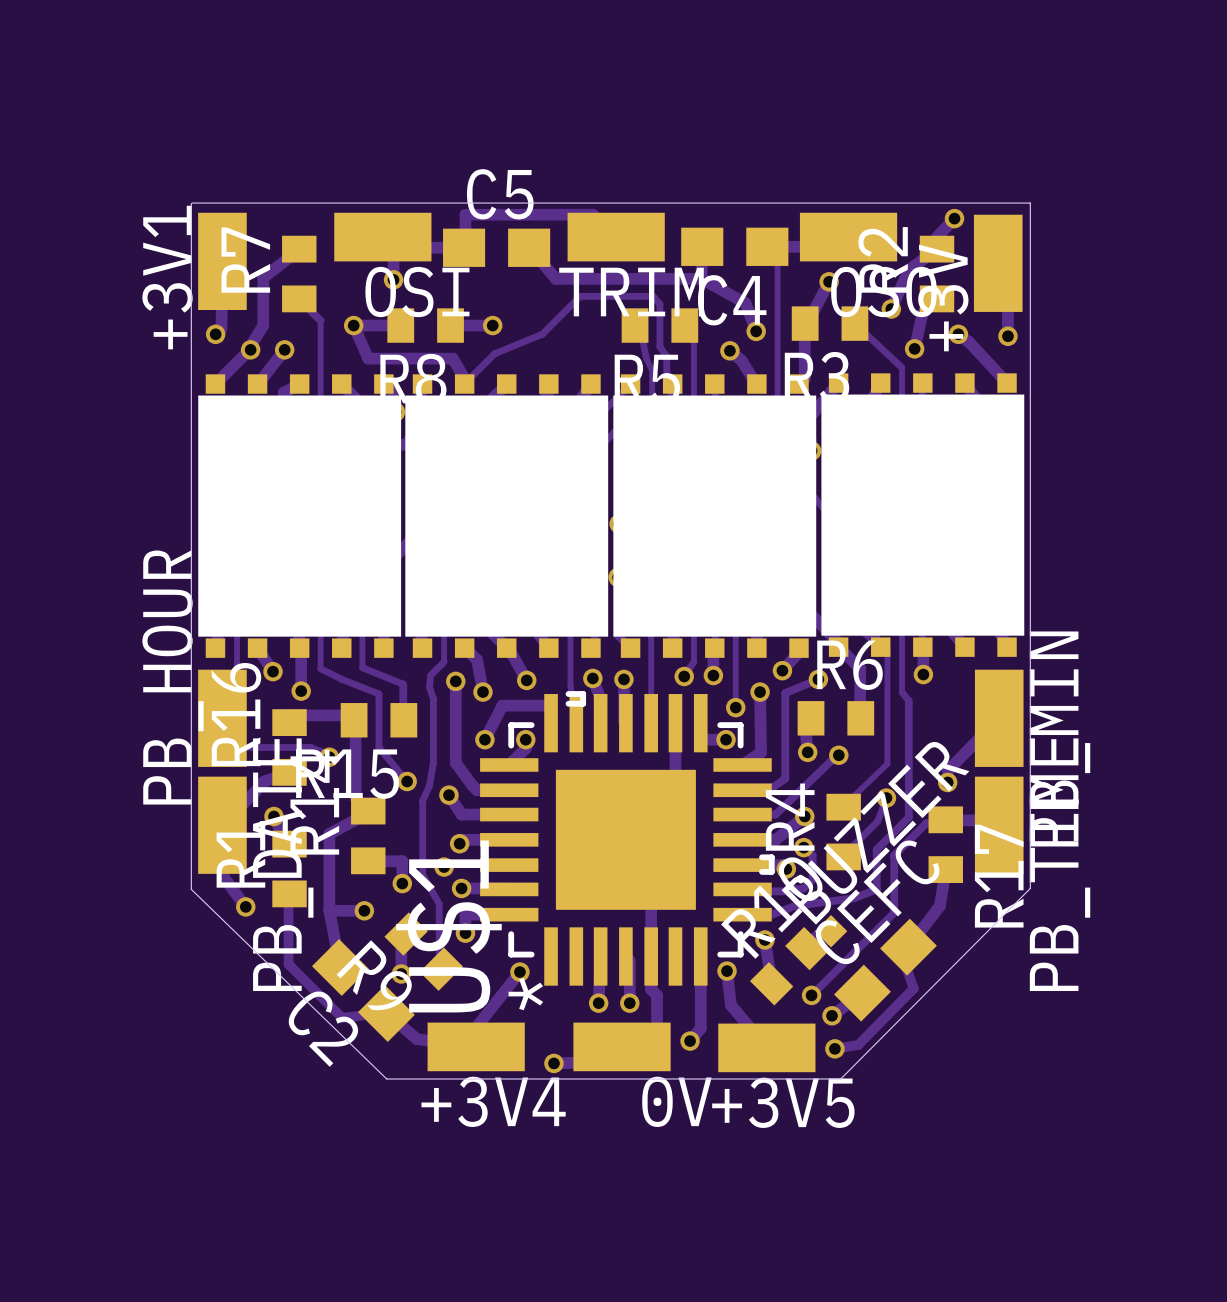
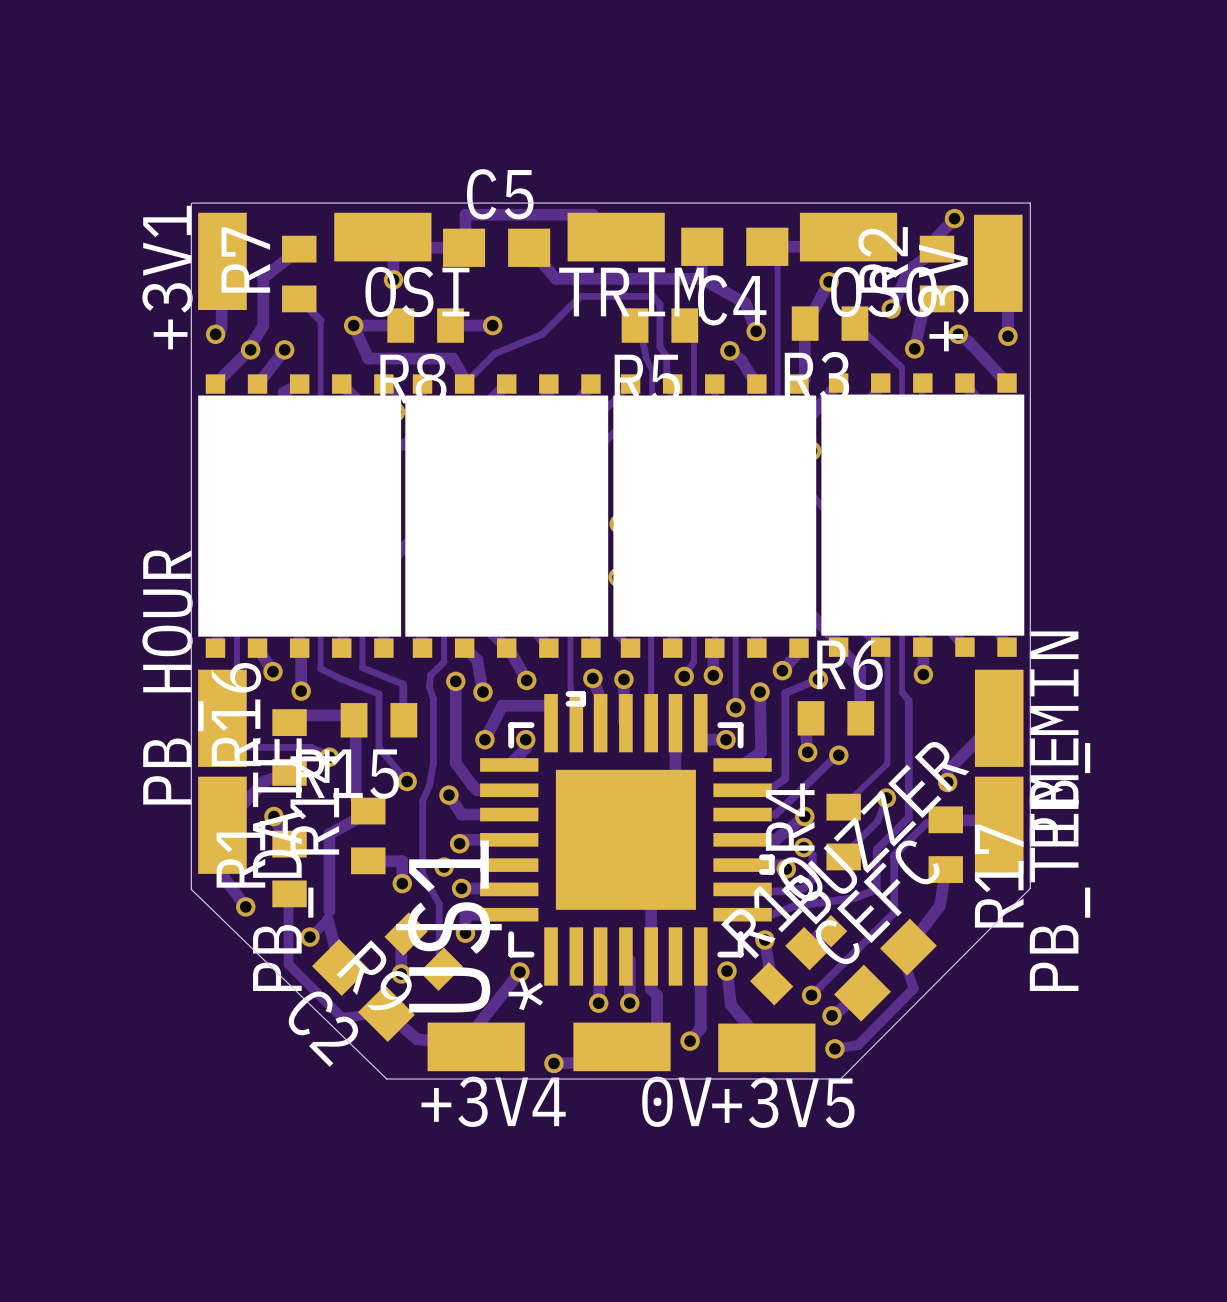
track: (364, 910) (329, 910) (340, 967) -> (309, 937) (327, 919) (340, 967)
via position: (364, 910) -> (309, 937)

